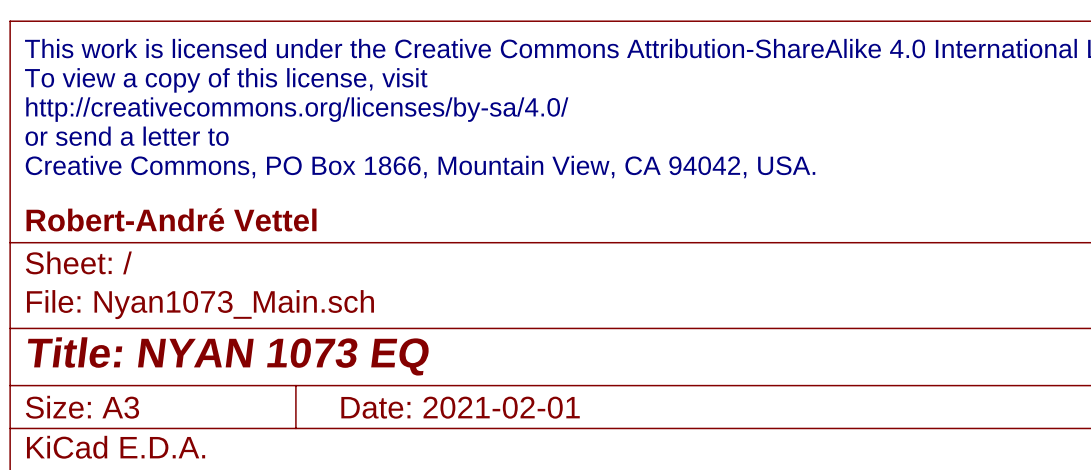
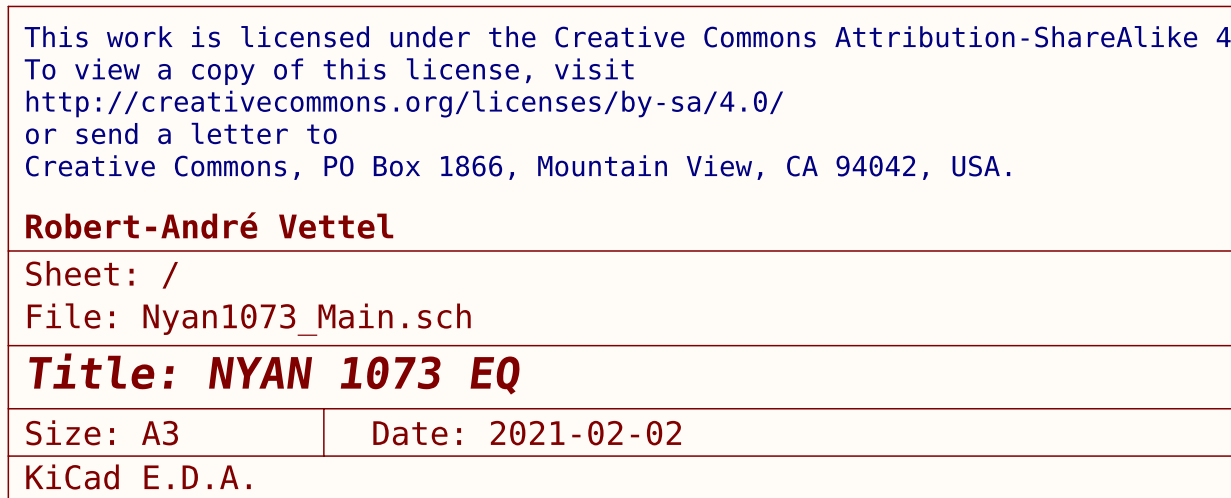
title block: Date: 2021-02-01 (460, 407) -> Date: 2021-02-02 (527, 433)

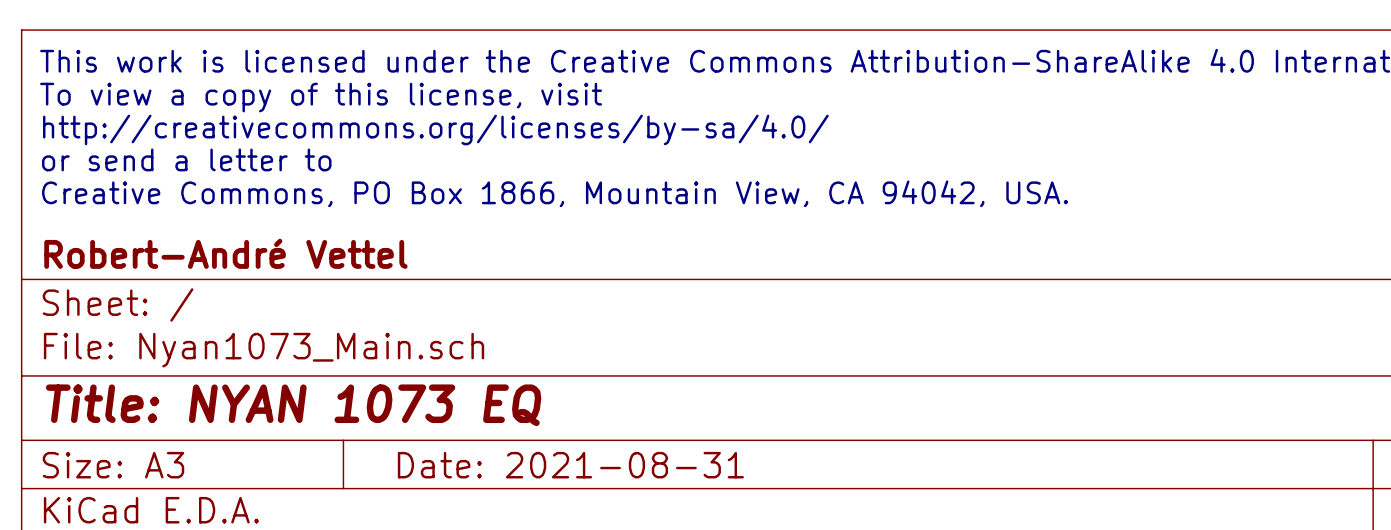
title block: Date: 2021-02-02 (527, 433) -> Date: 2021-08-31 (570, 465)

